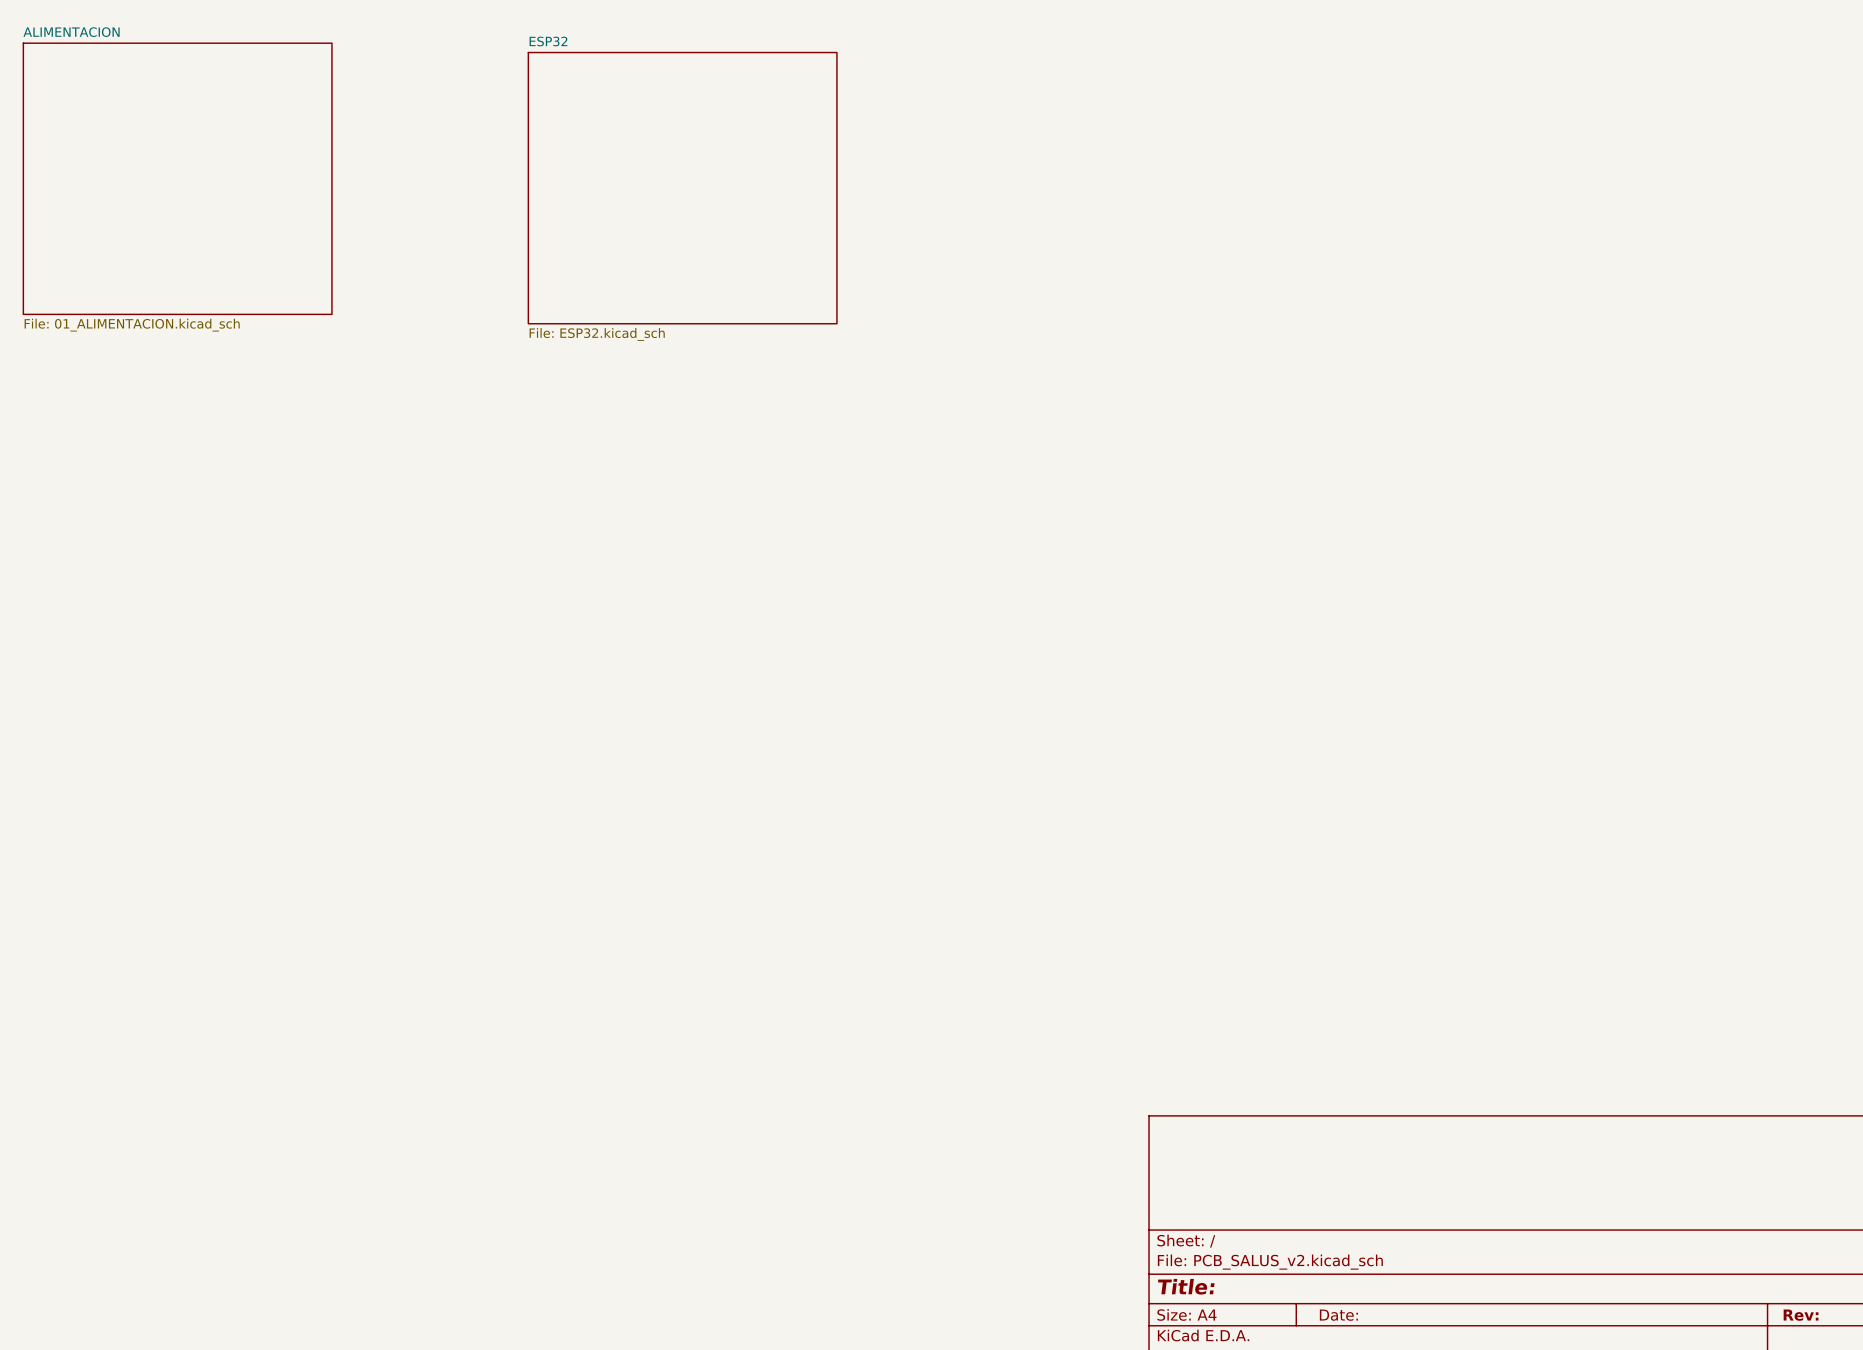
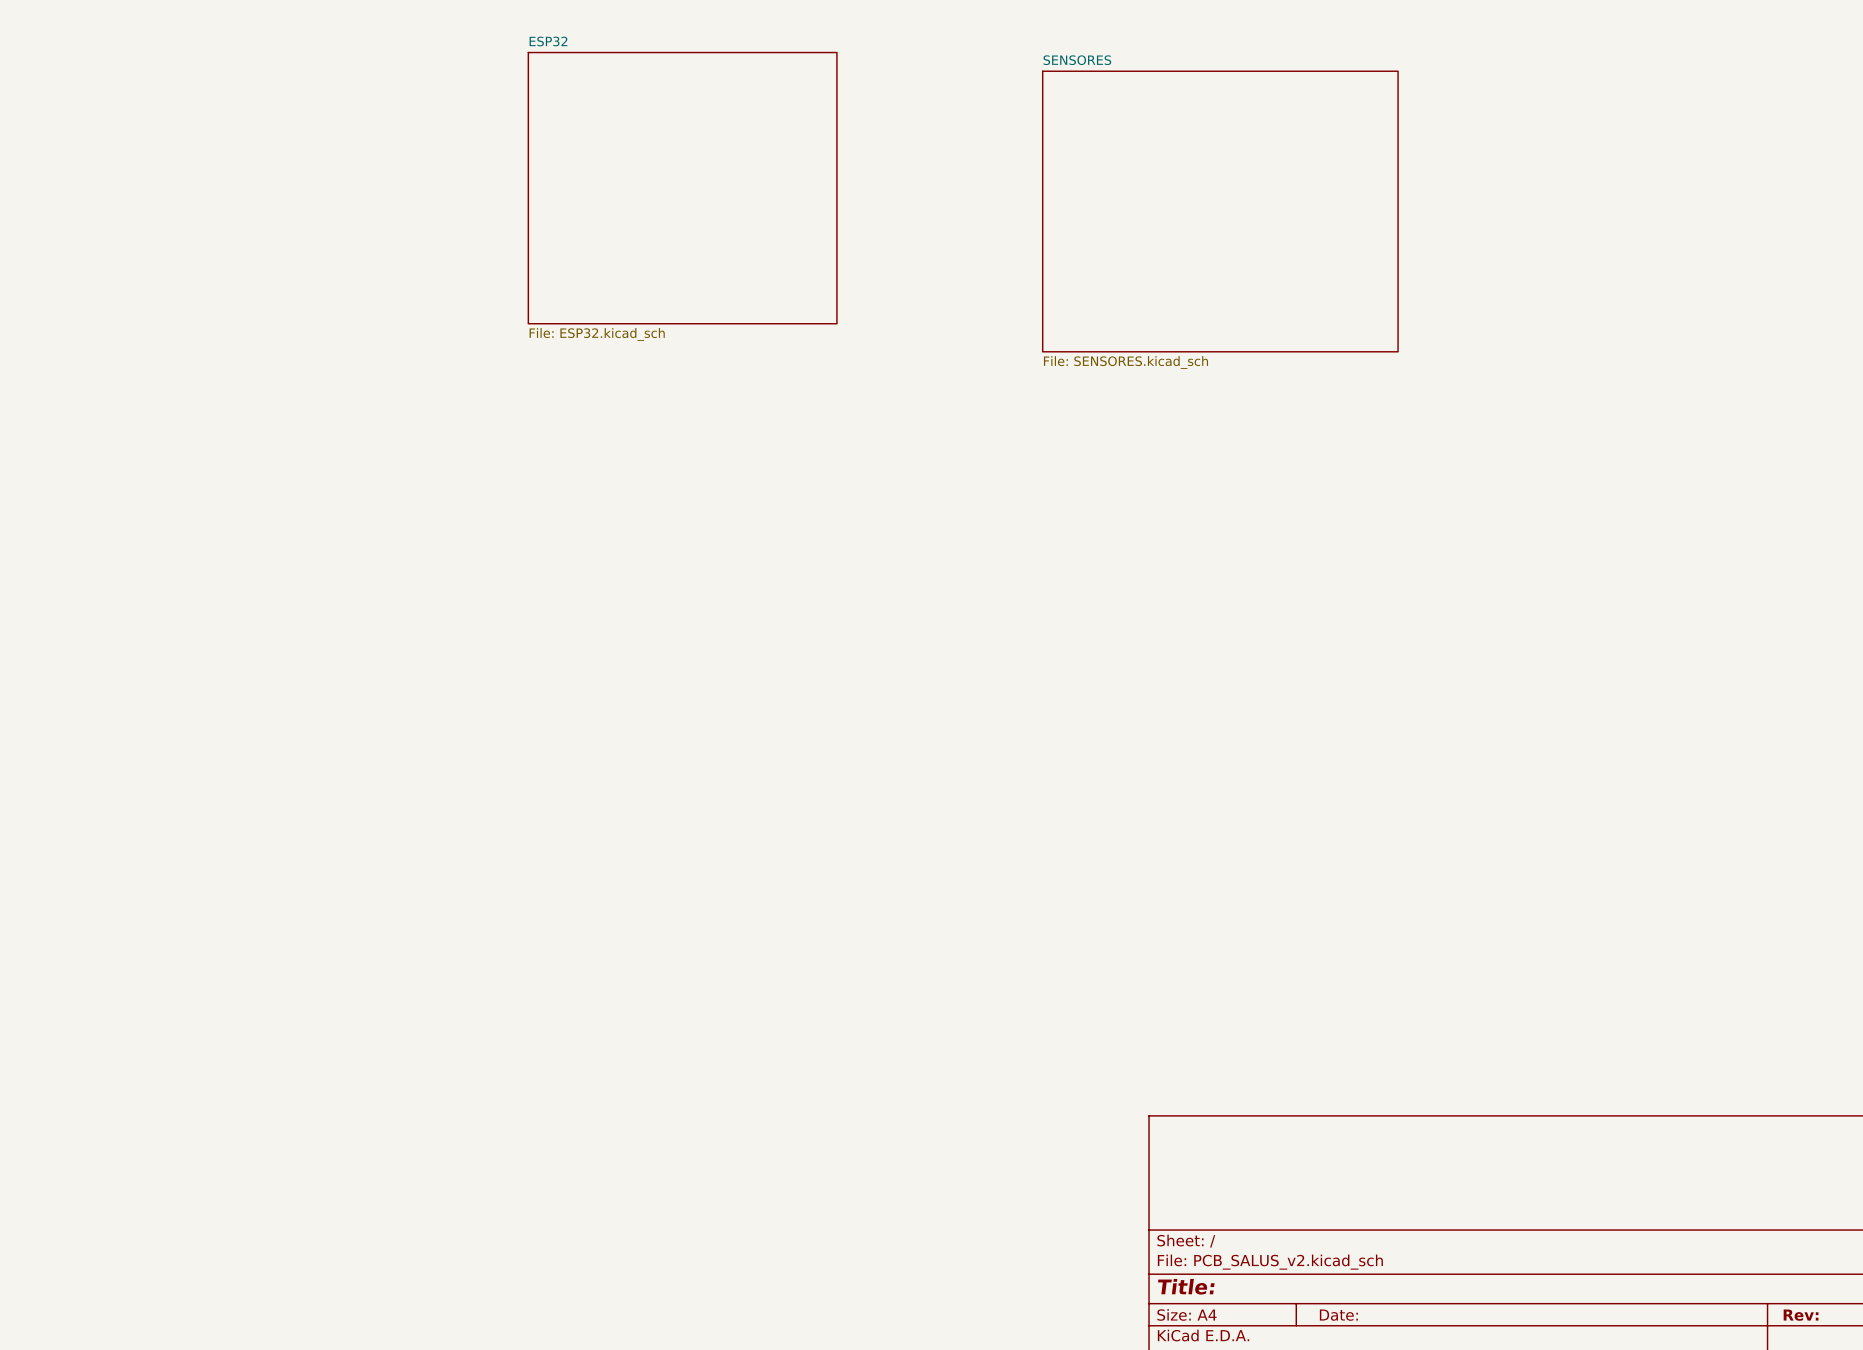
sheet ALIMENTACION: File: 01_ALIMENTACION.kicad_sch (177, 178) -> none
sheet SENSORES: none -> File: SENSORES.kicad_sch (1220, 211)

